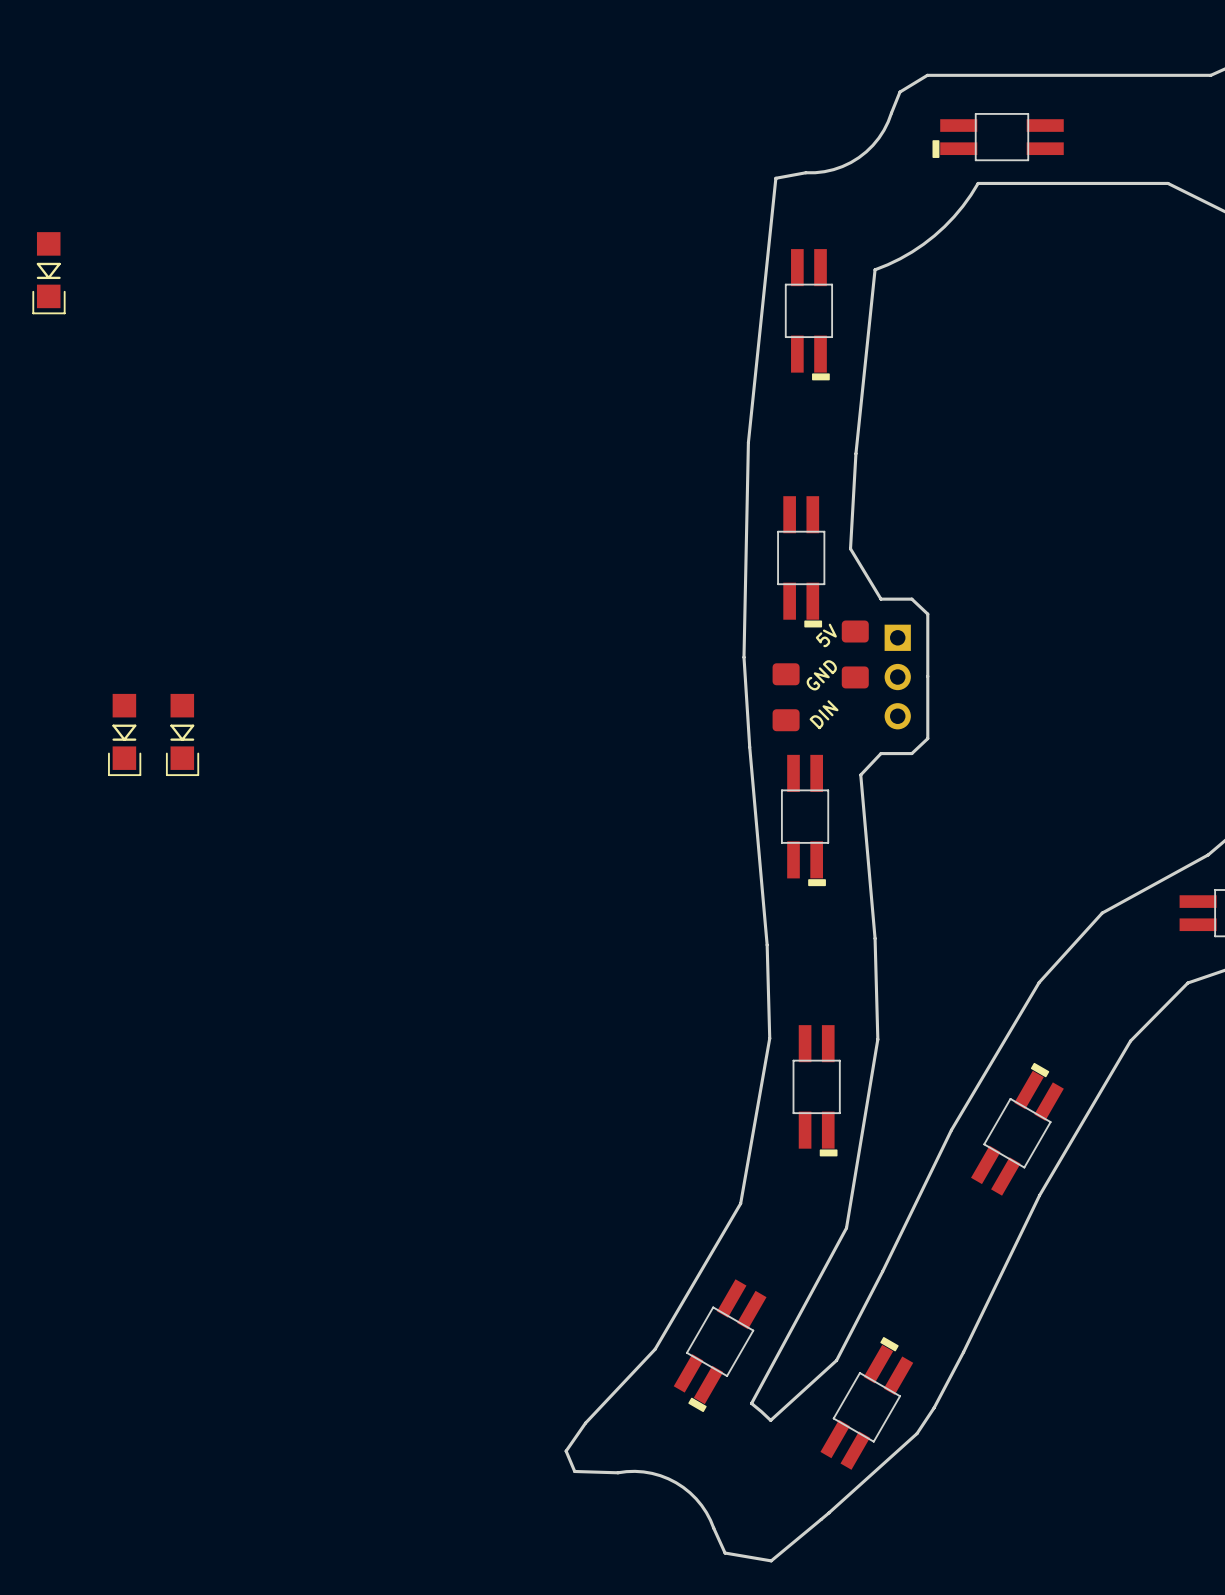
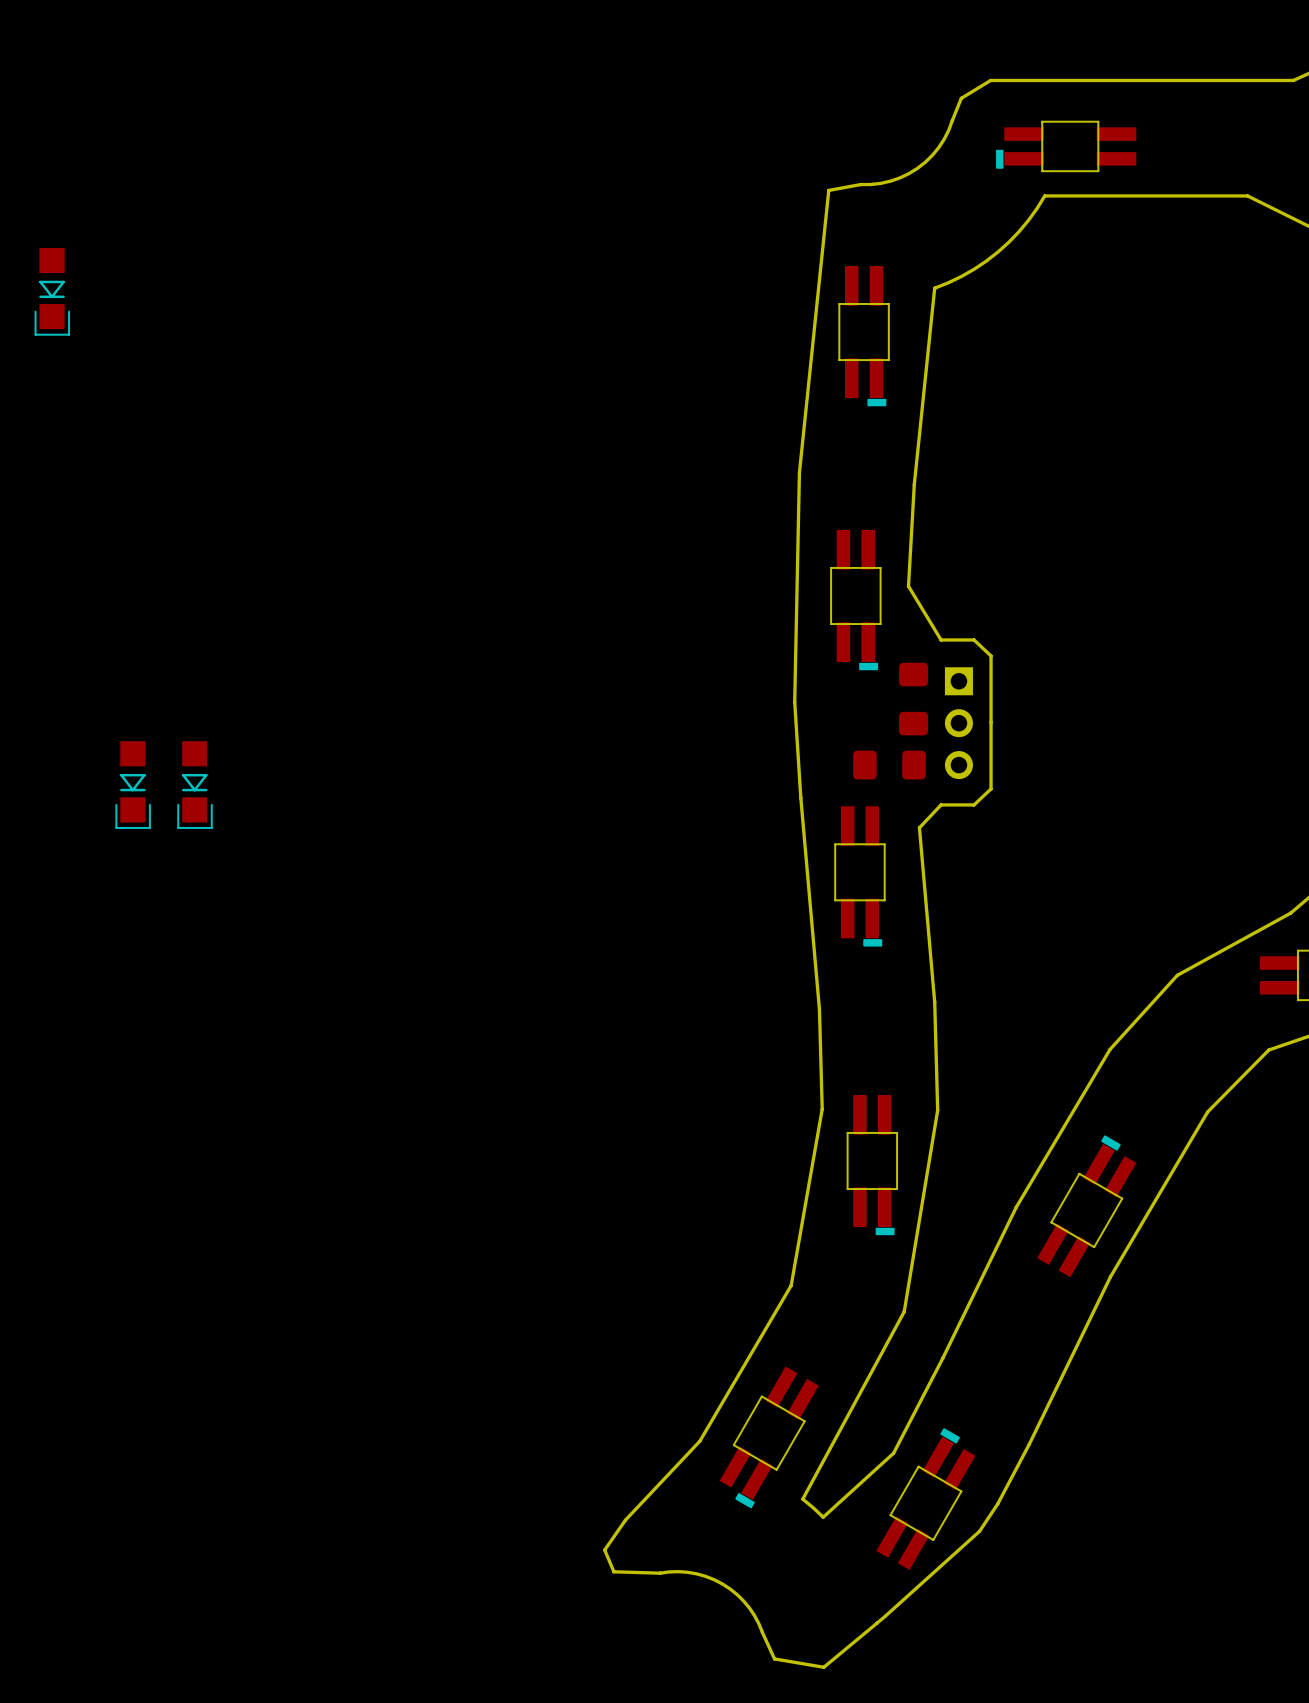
text: 5V (826, 635) -> none
text: GND (821, 675) -> none
part rotation: 0° (786, 697) -> 90° clockwise (889, 765)
part position: (786, 697) -> (889, 765)
text: DIN (824, 714) -> none

